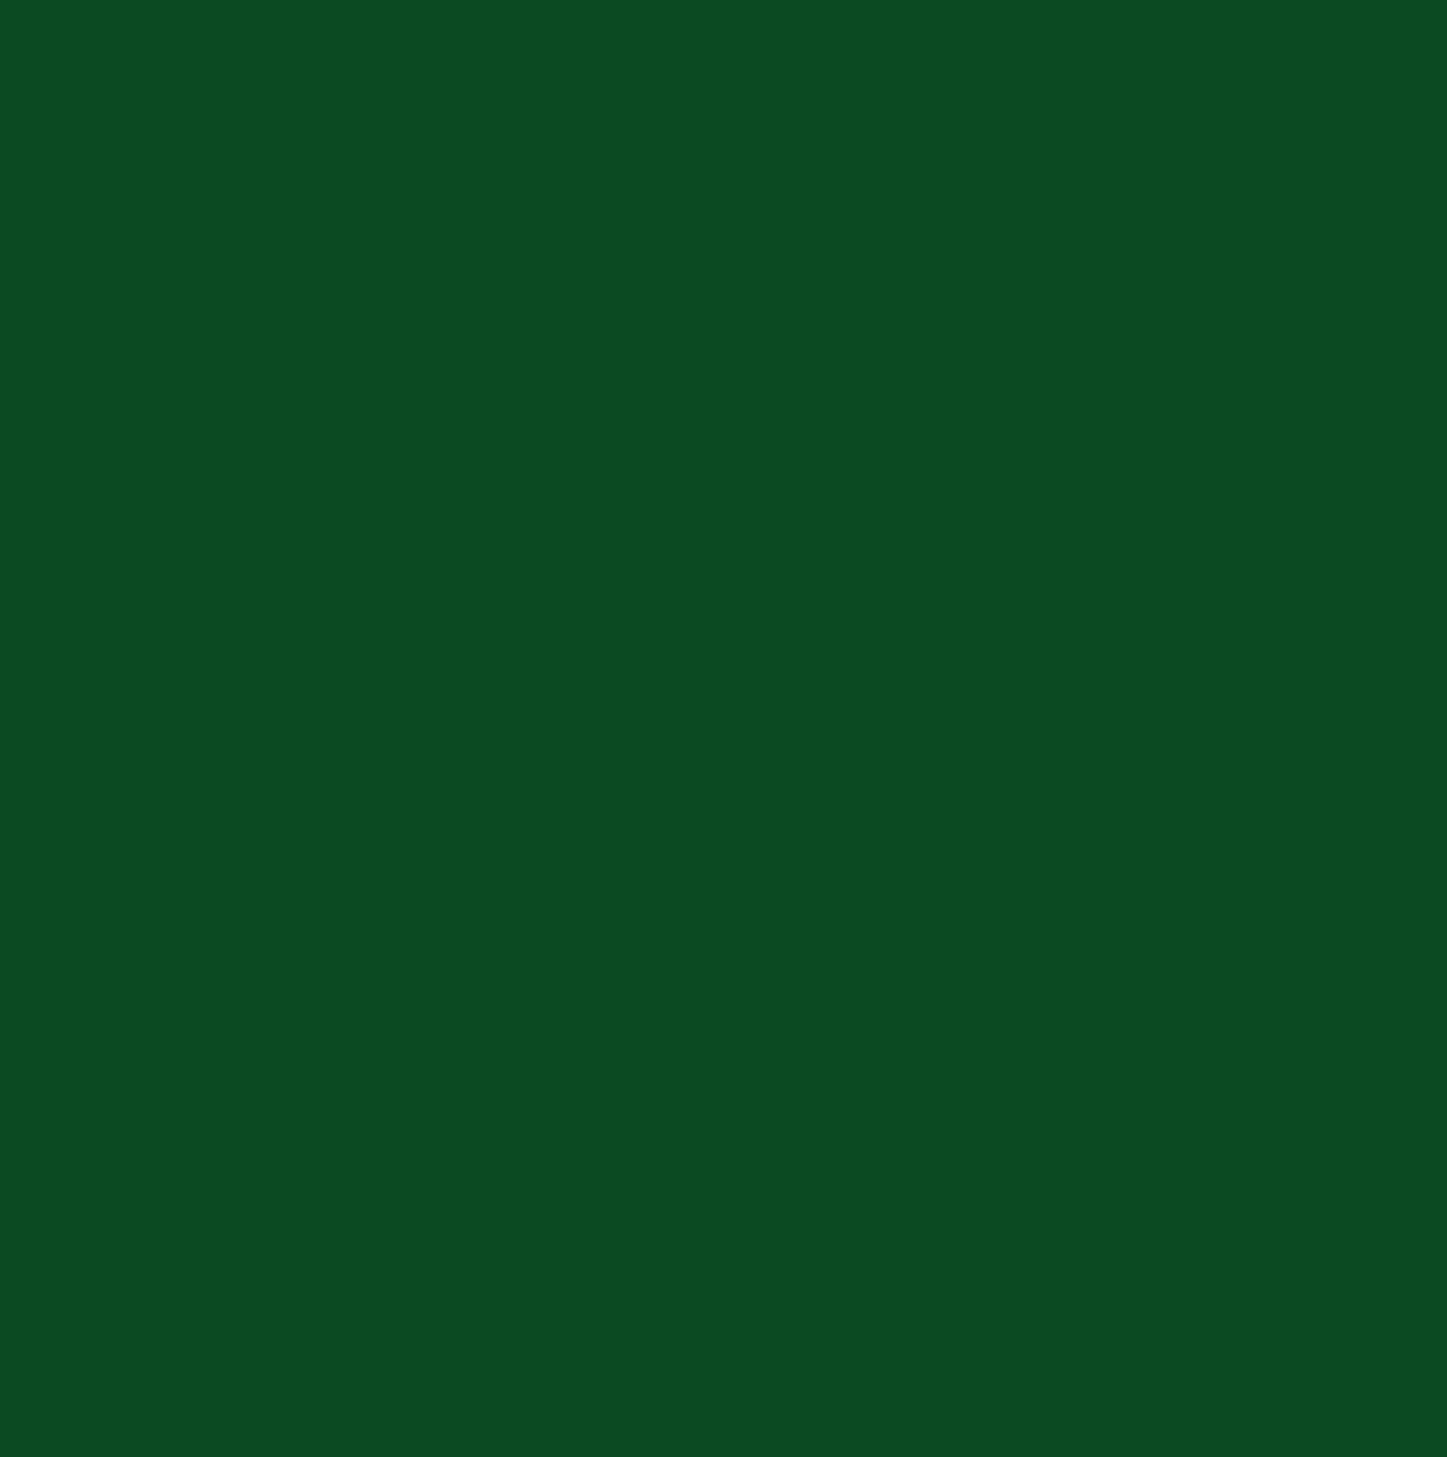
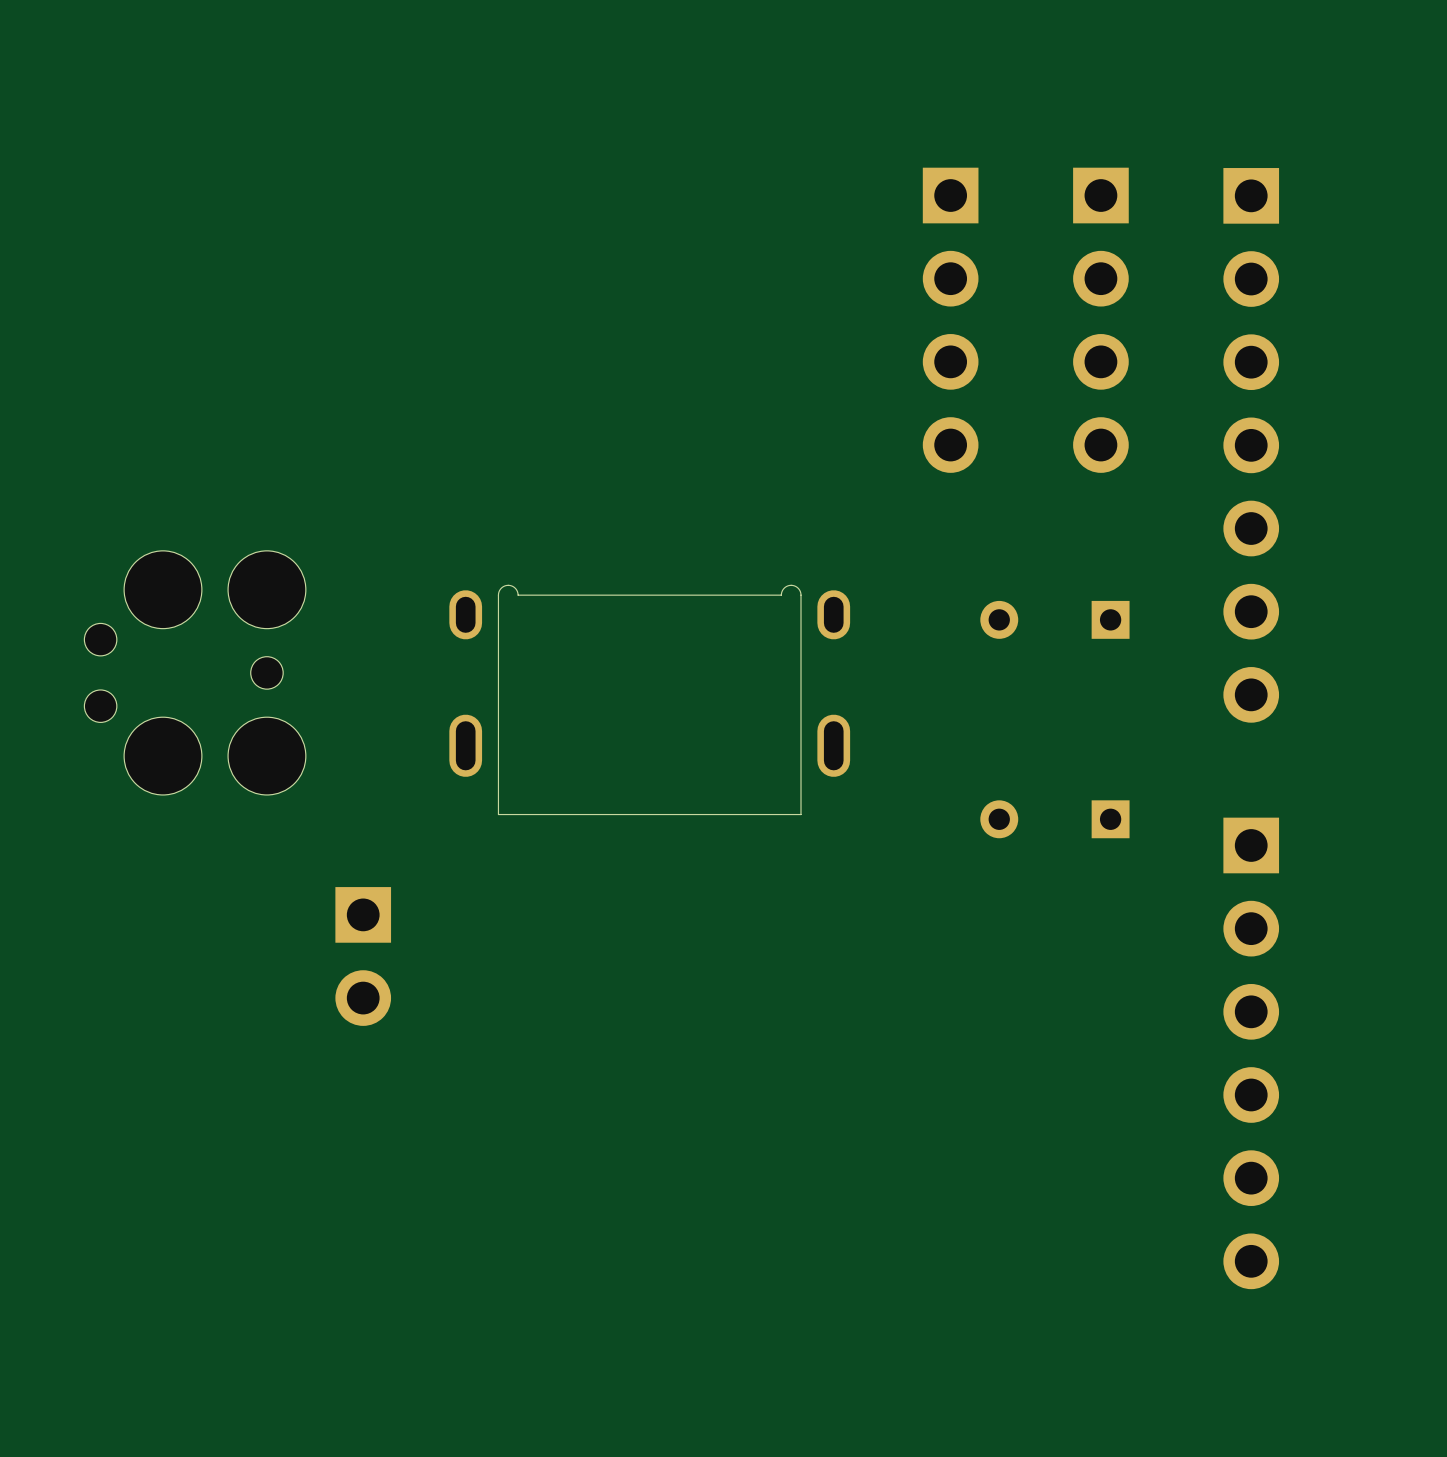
part: none -> (950, 320)
part: none -> (1100, 320)
part: none -> (1251, 445)
part: none -> (1054, 619)
part: none -> (195, 672)
part: none -> (649, 699)
part: none -> (1054, 819)
part: none -> (363, 956)
part: none -> (1251, 1053)

